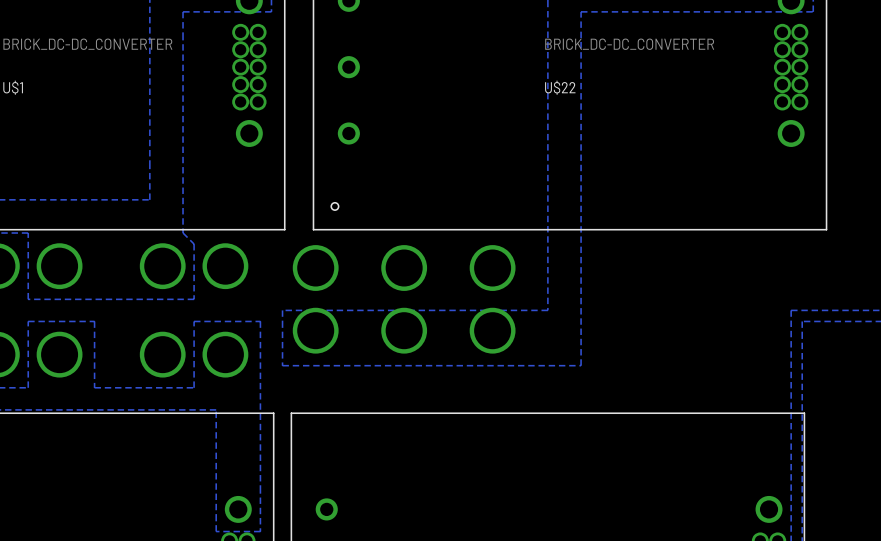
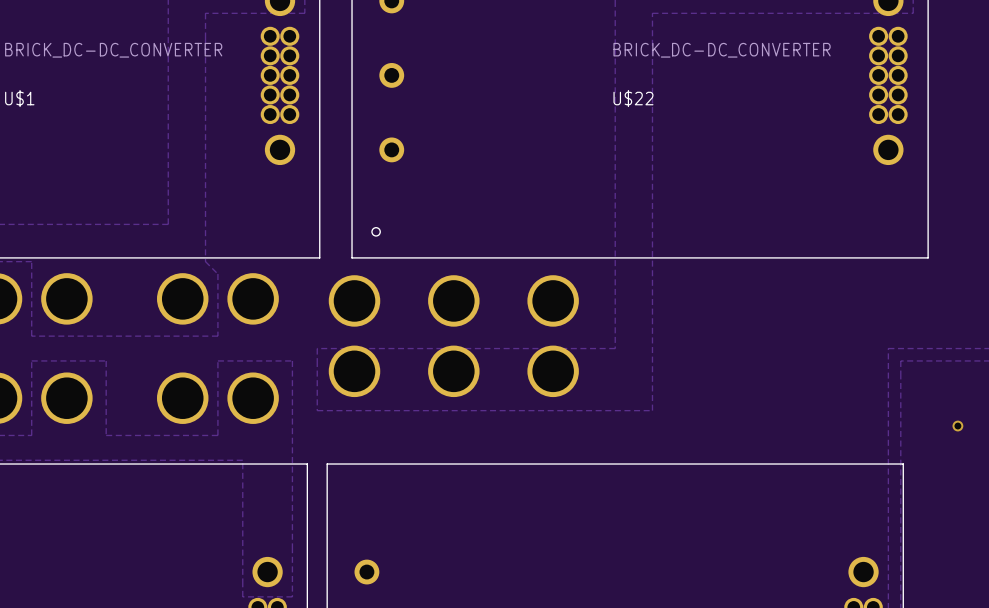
via: none -> (957, 426)

